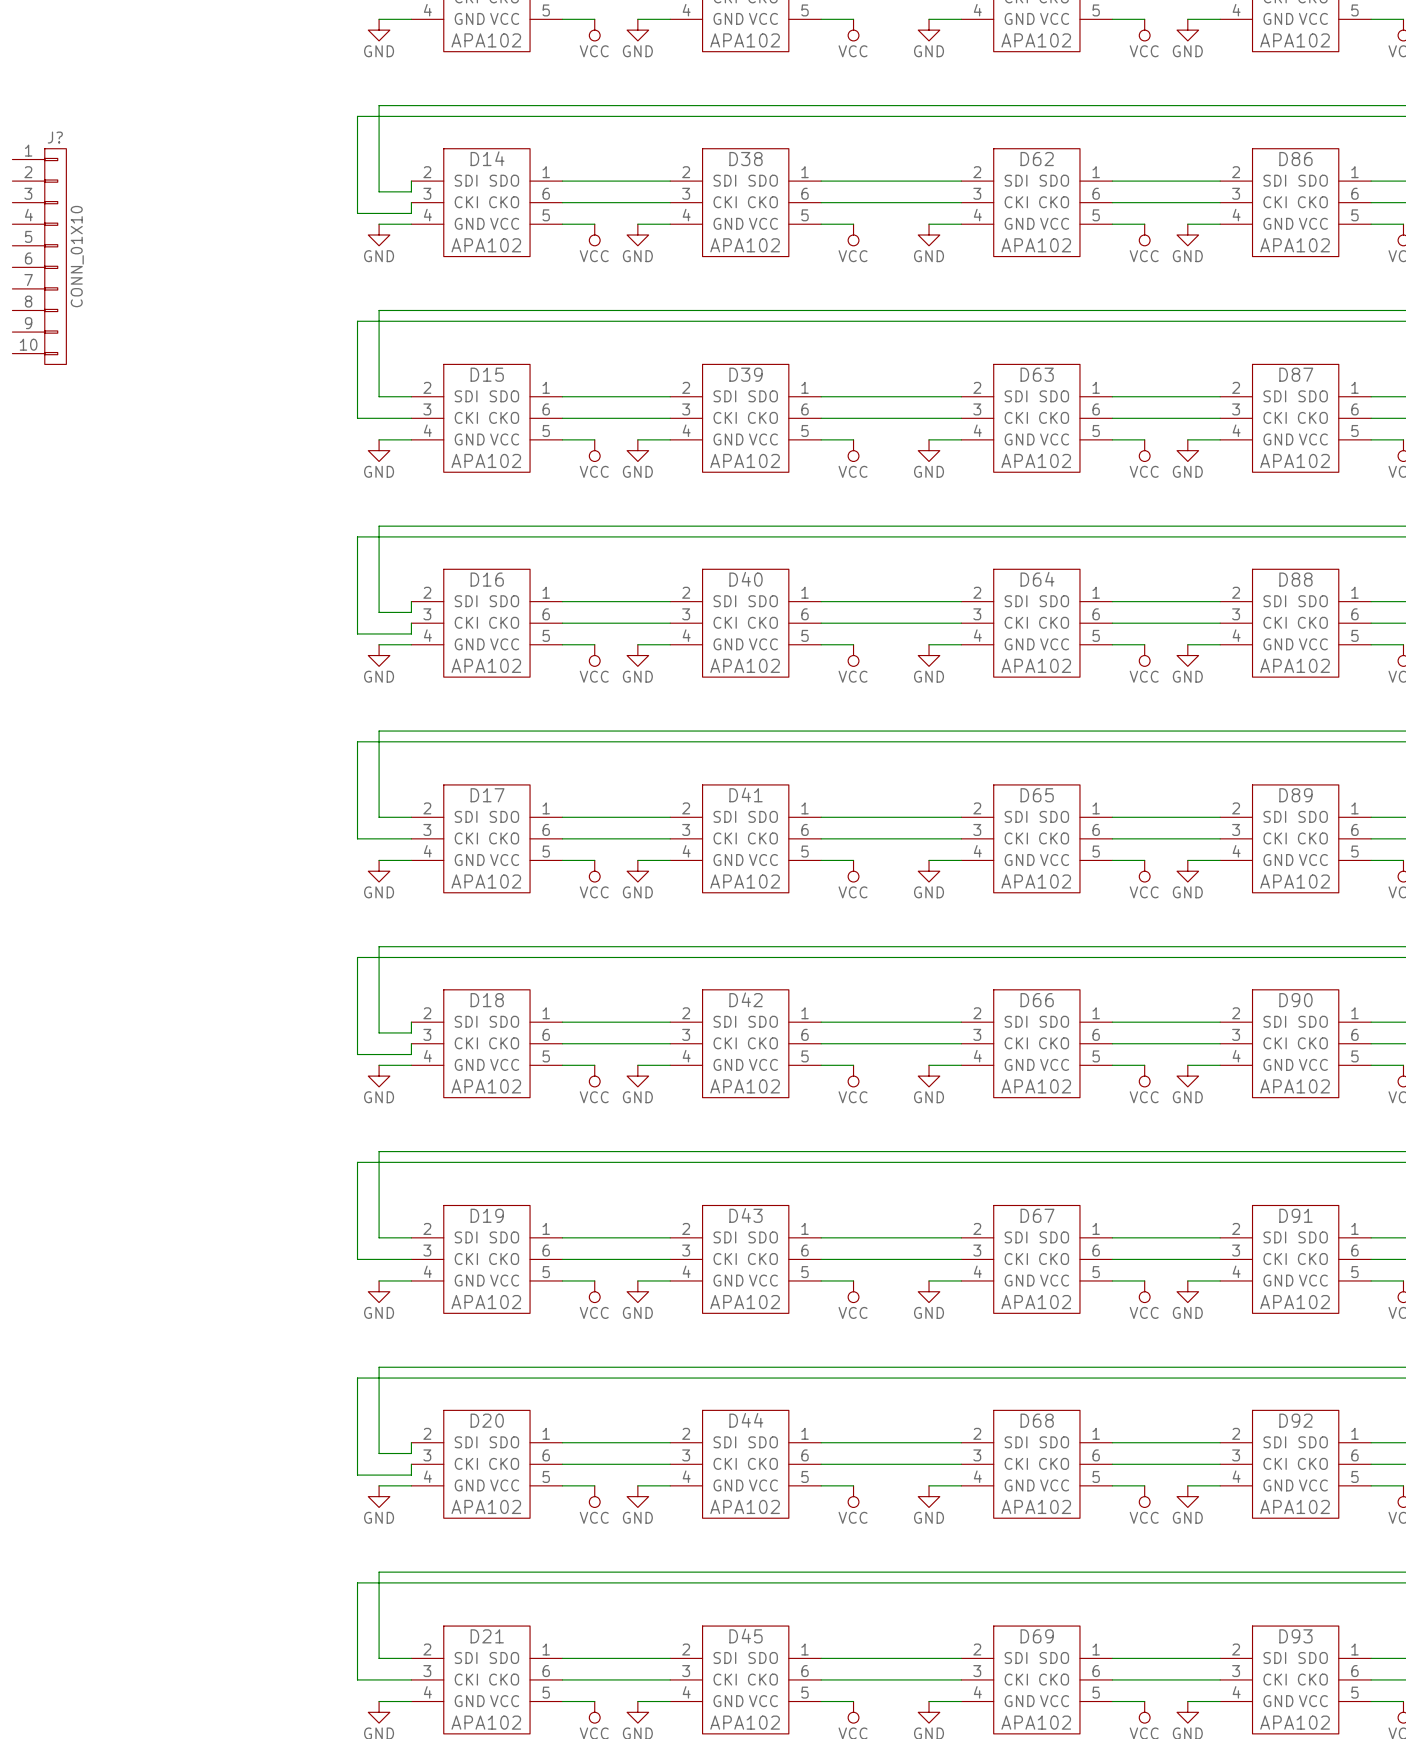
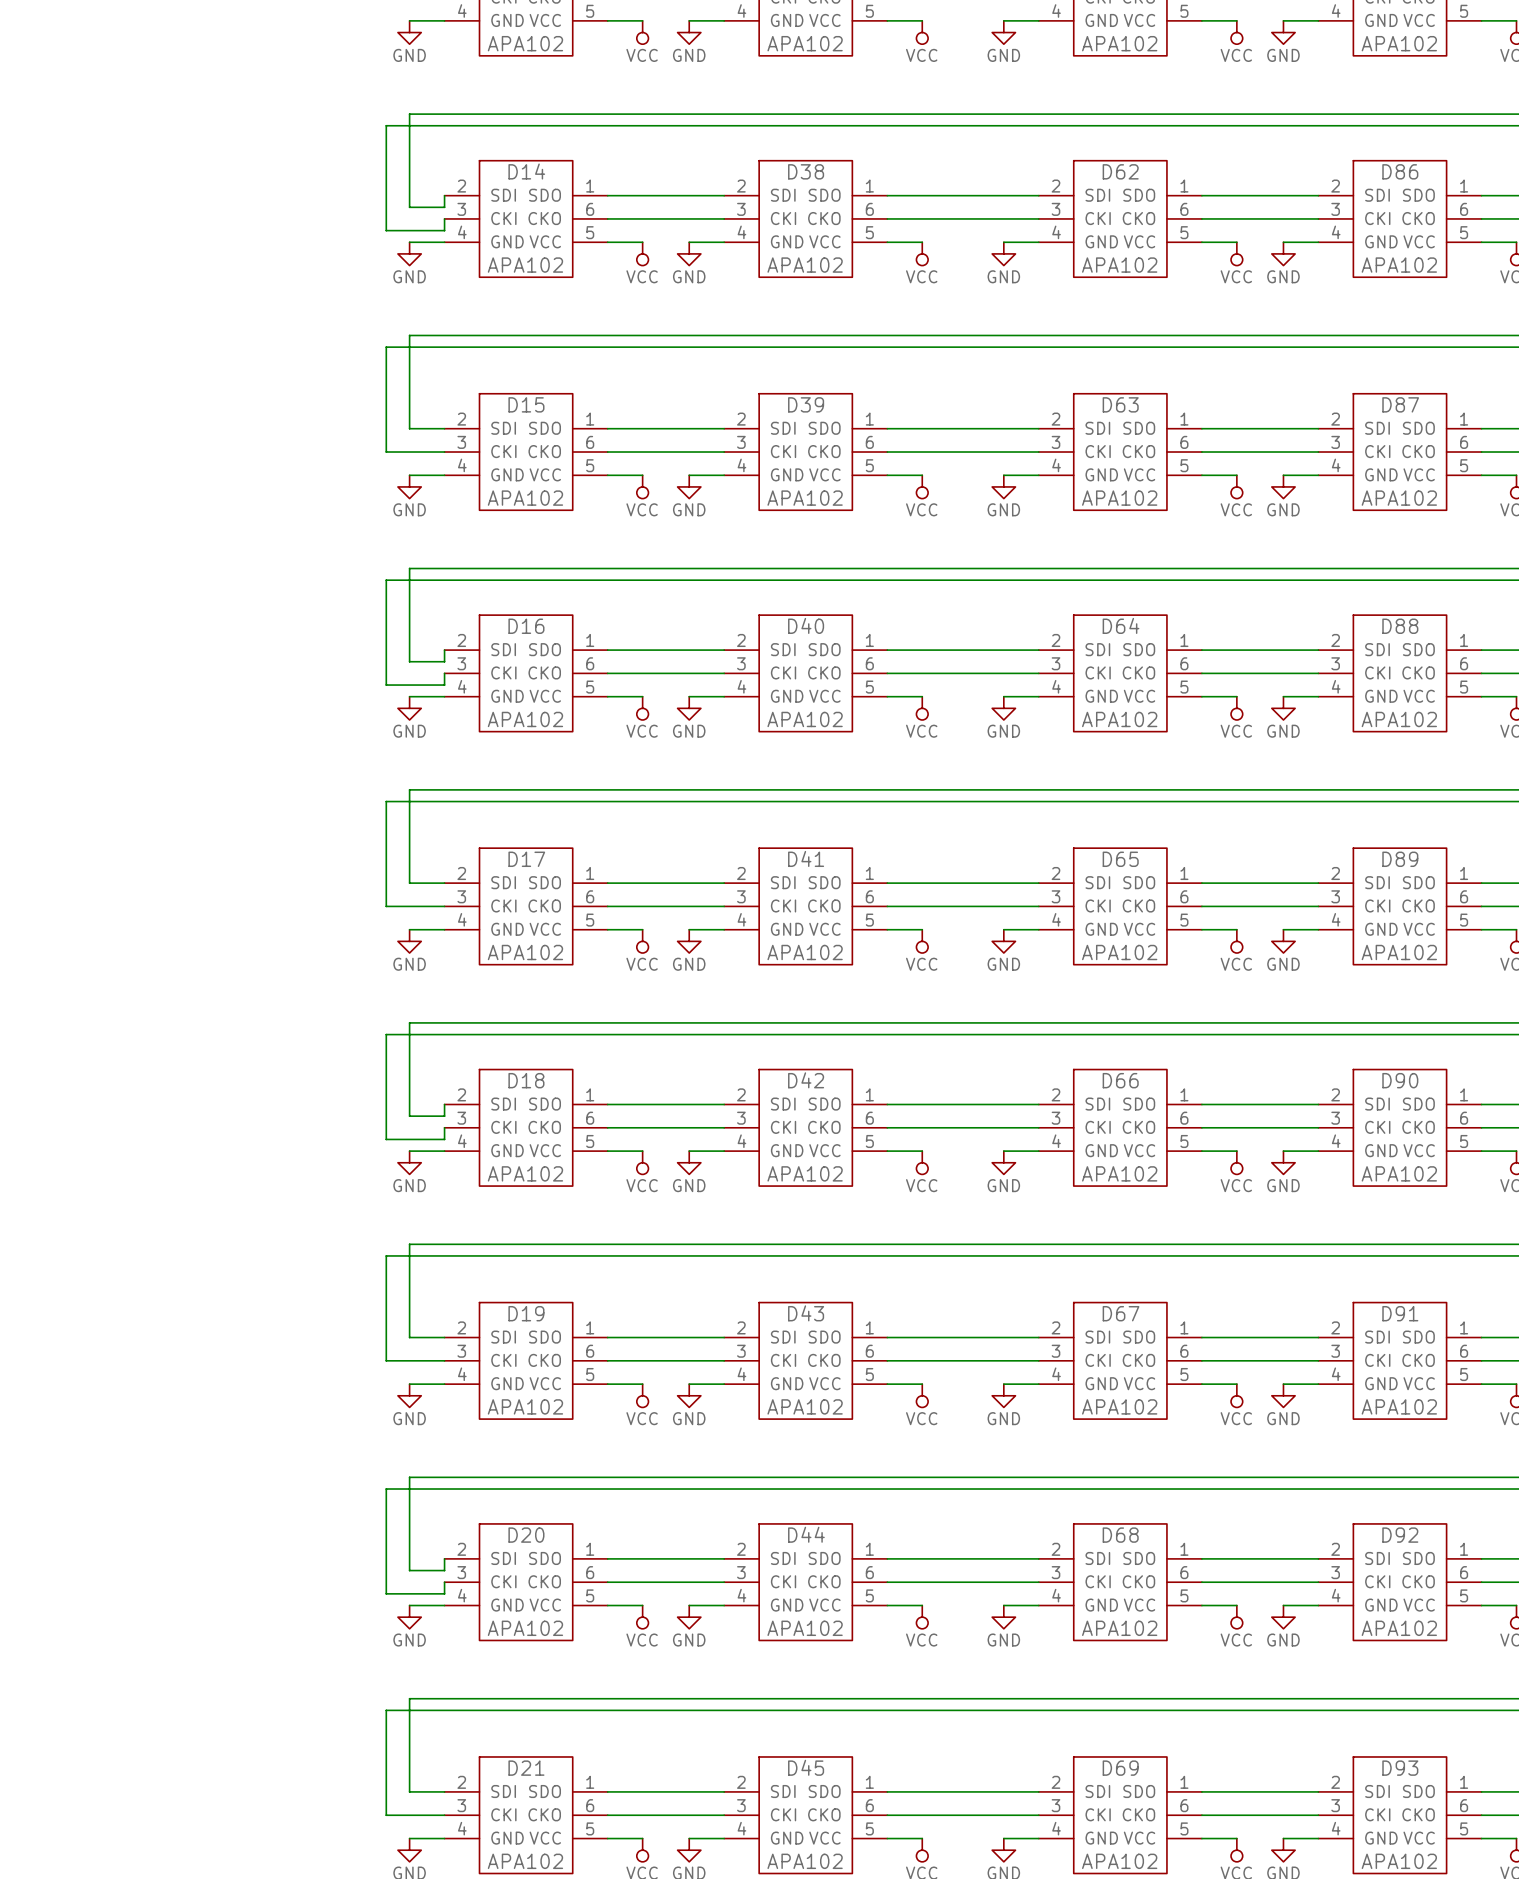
J?: CONN_01X10 (39, 256) -> none

